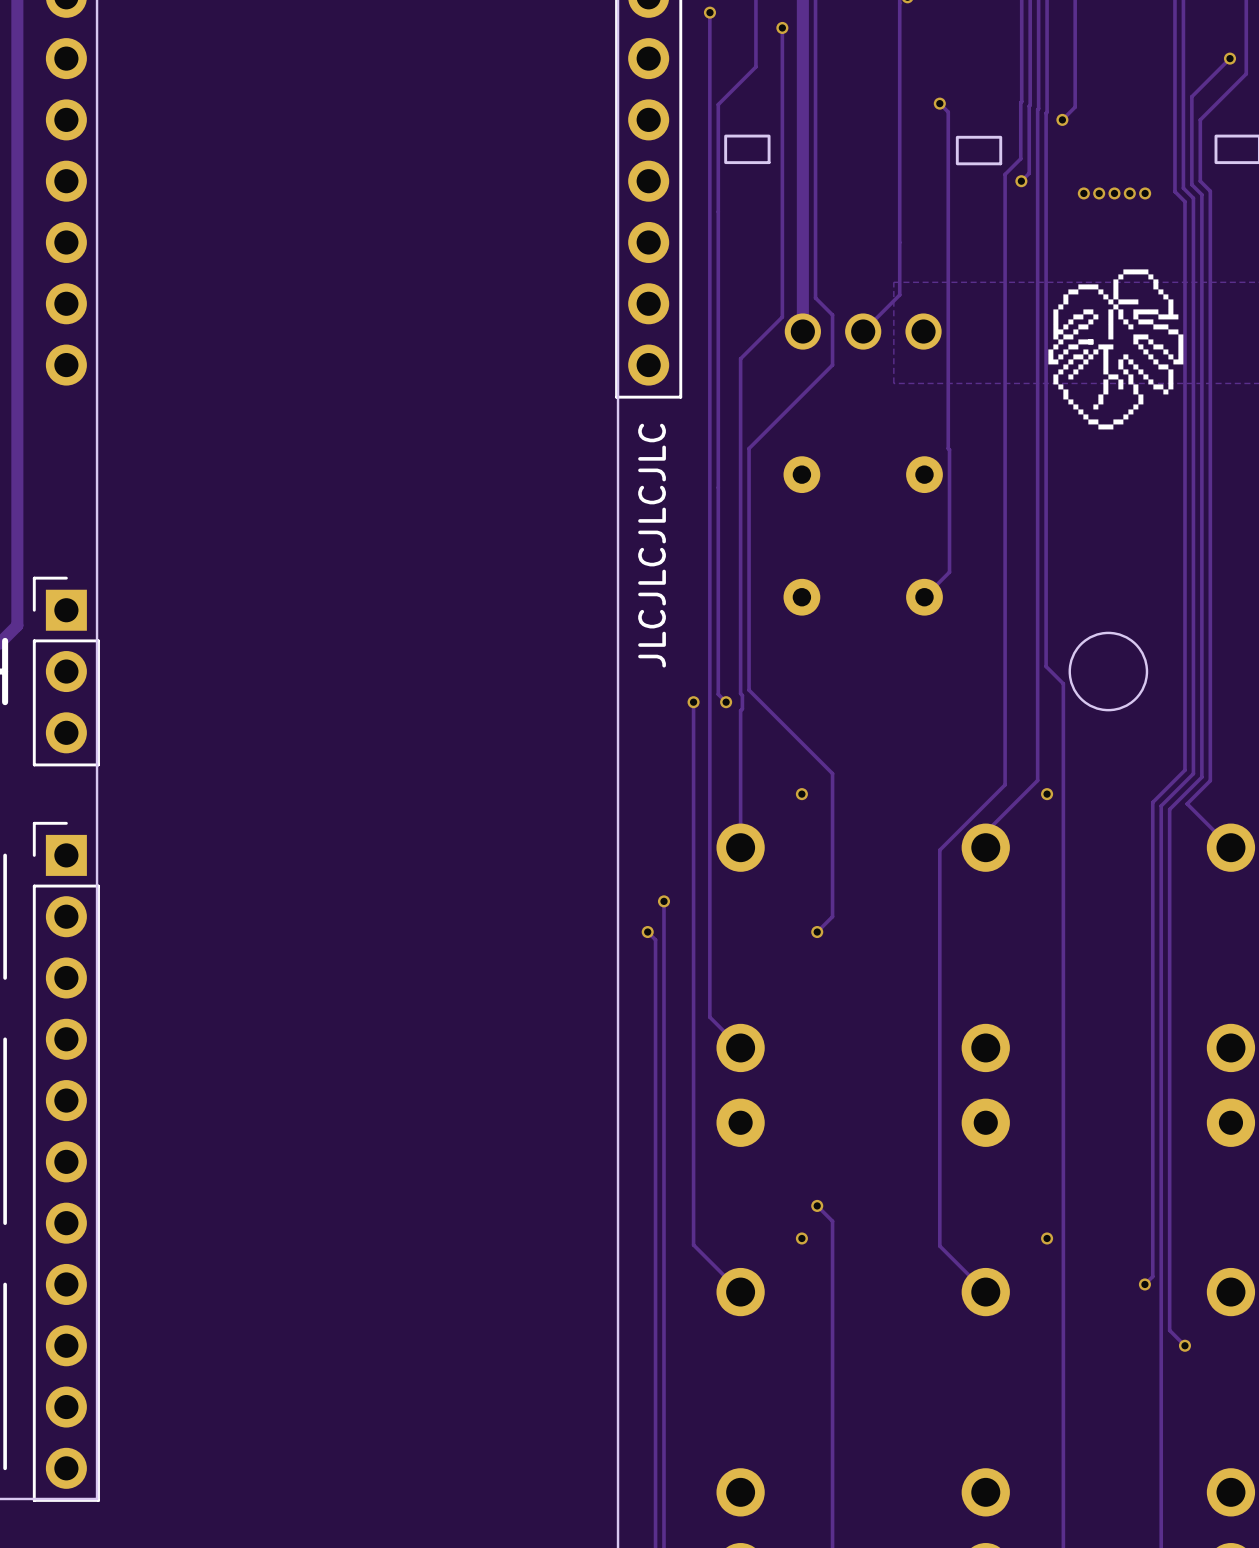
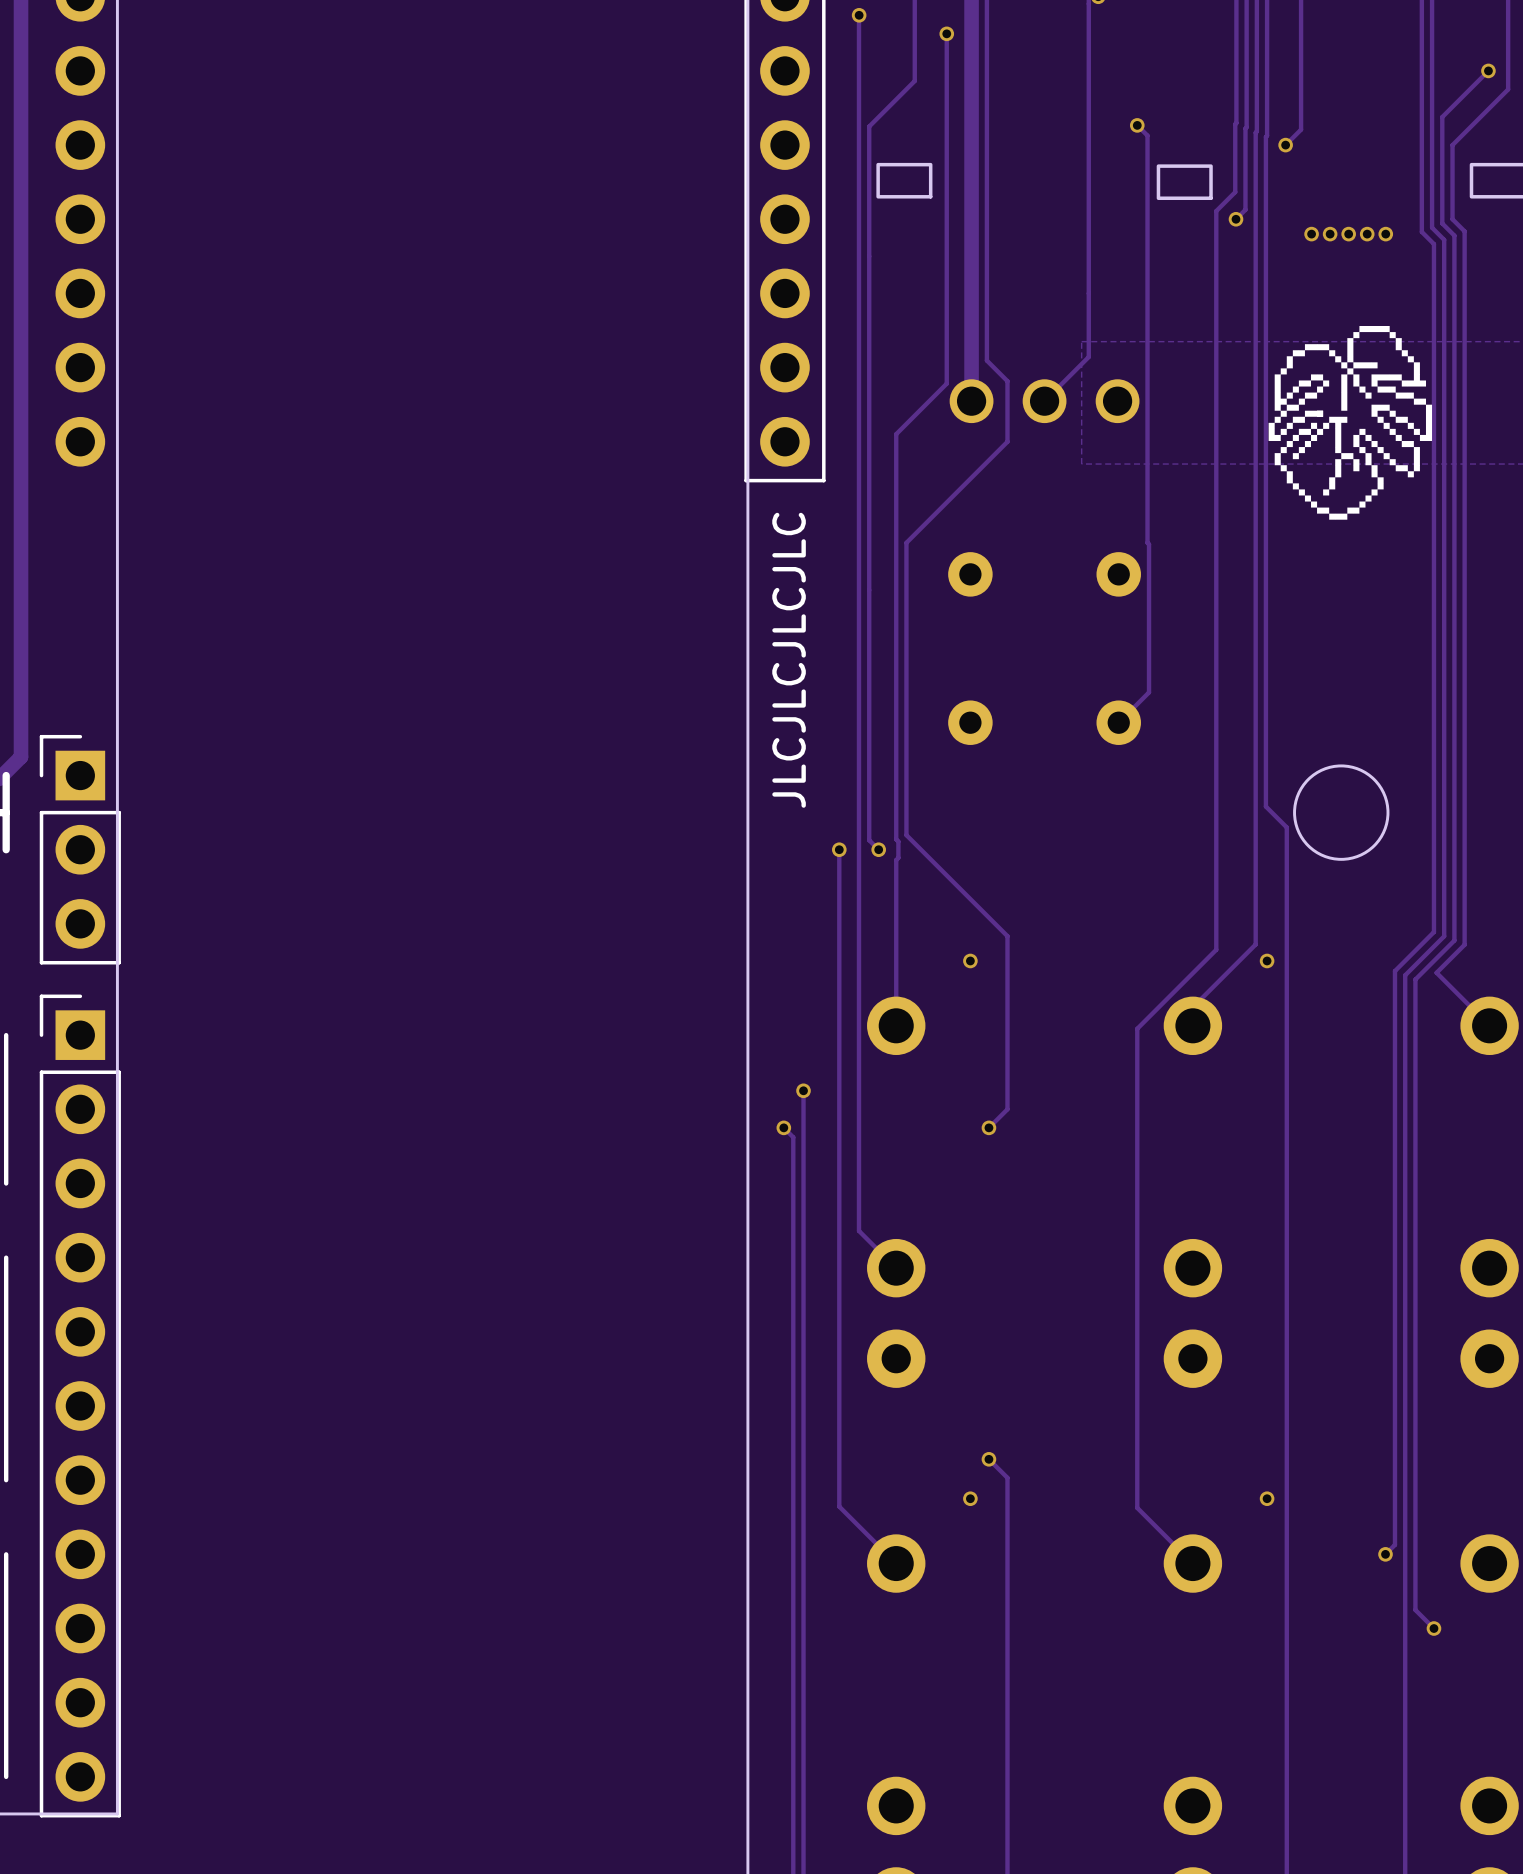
part position: (66, 671) -> (80, 849)

